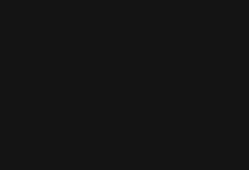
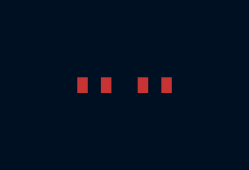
part: none -> (94, 85)
part: none -> (154, 85)

